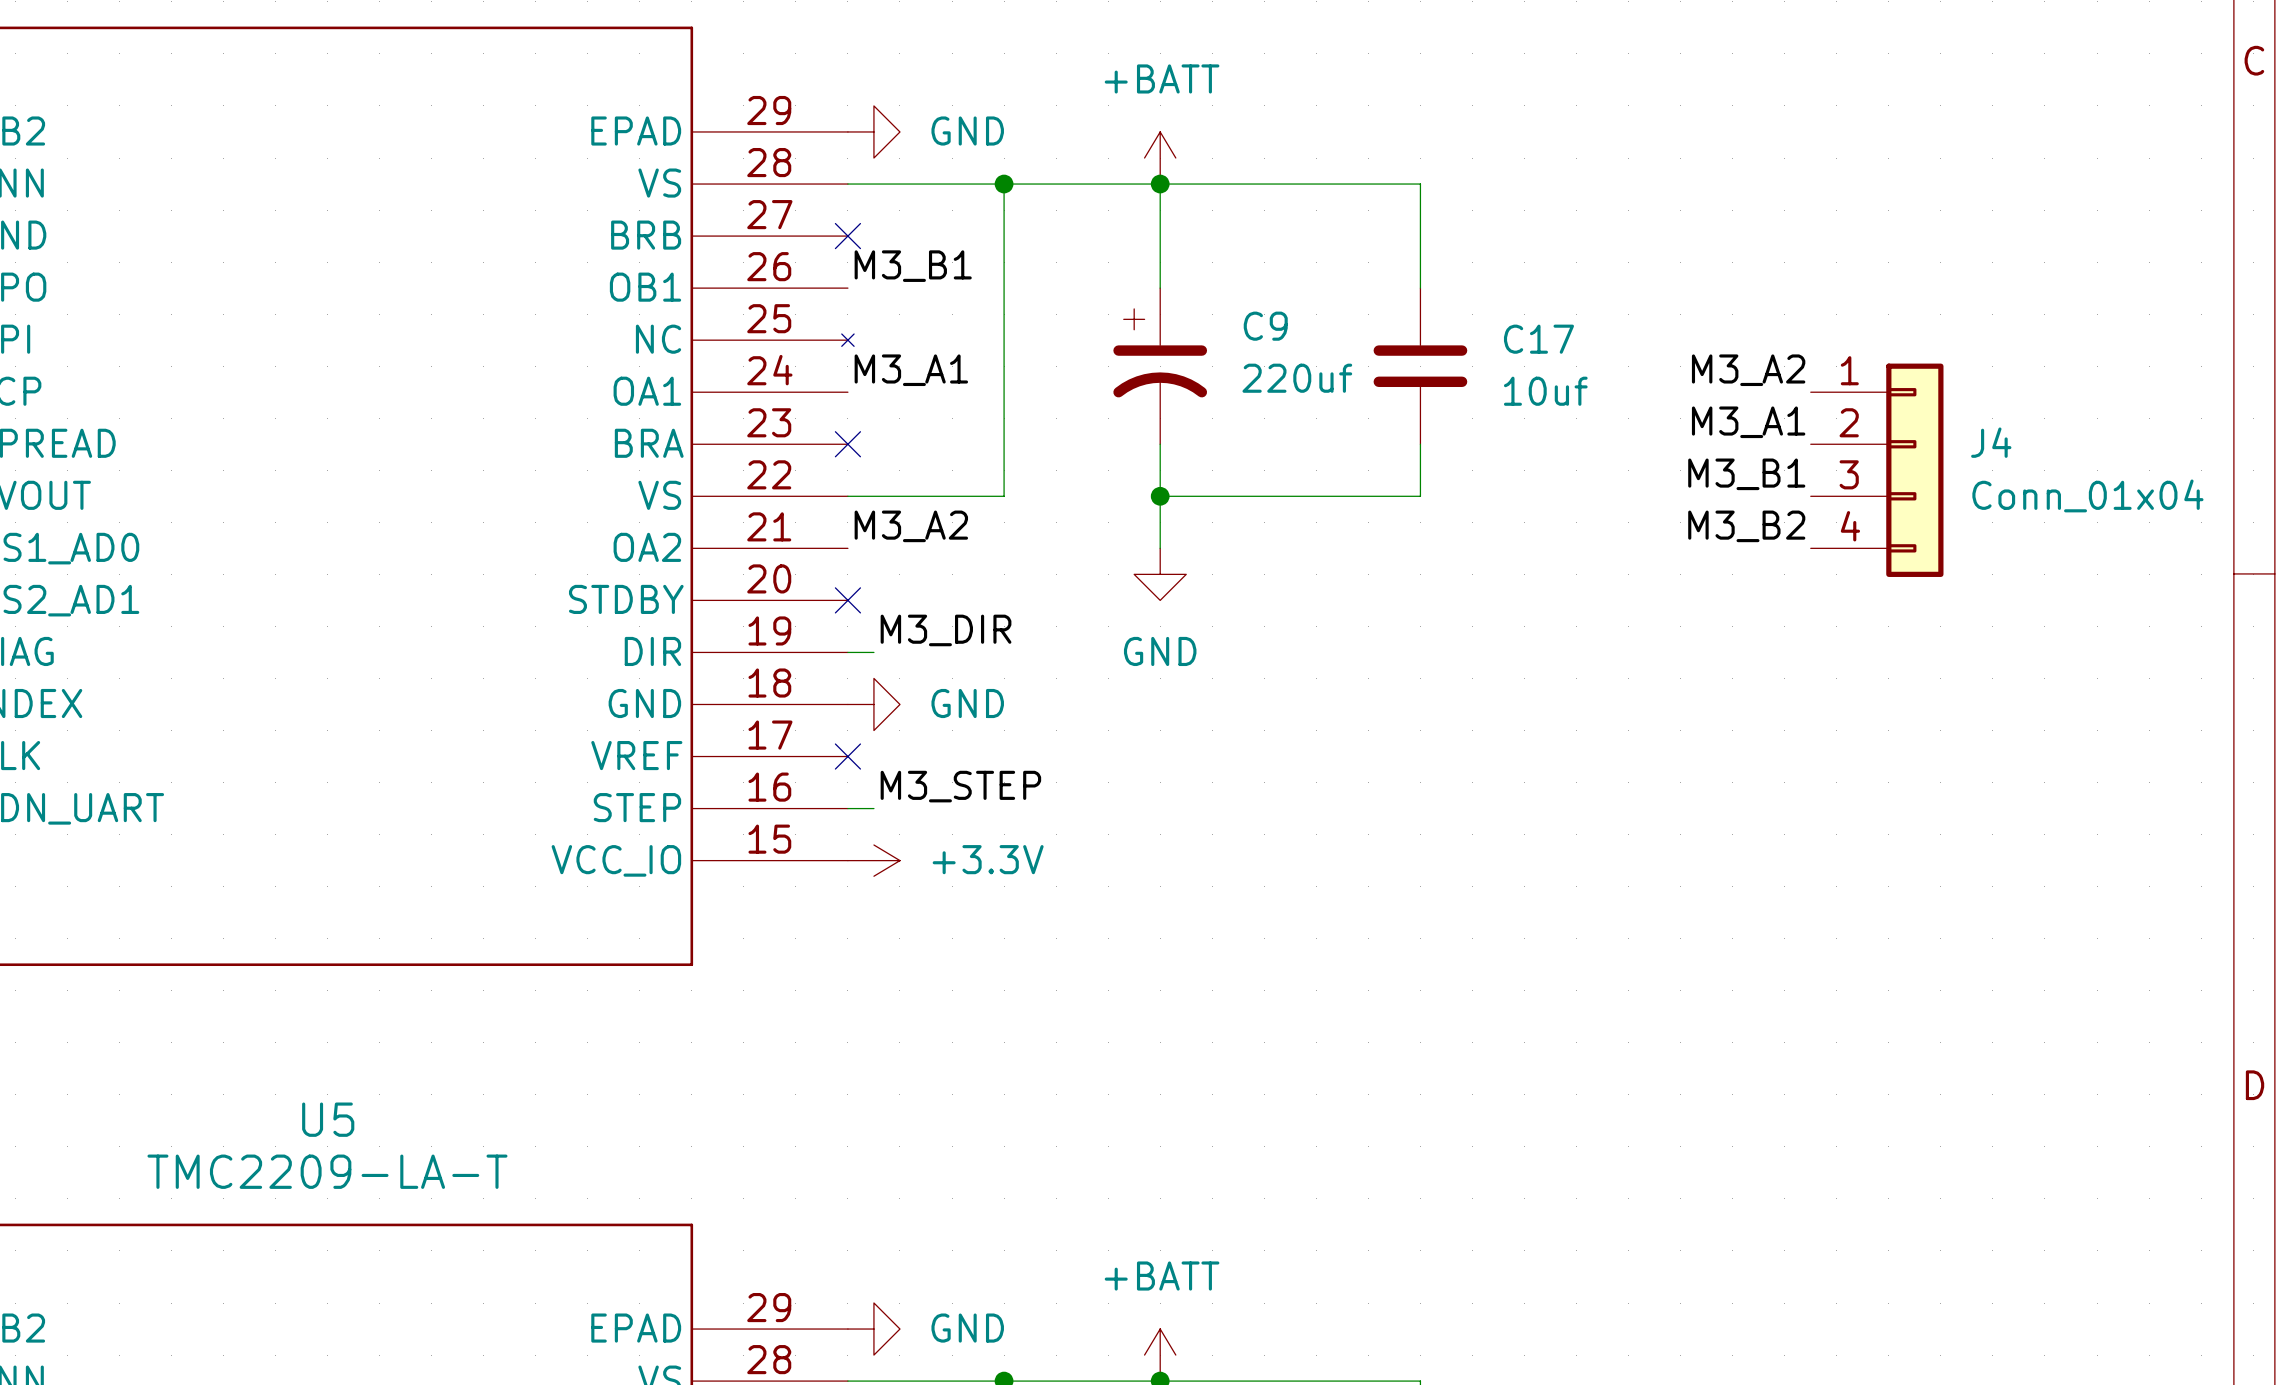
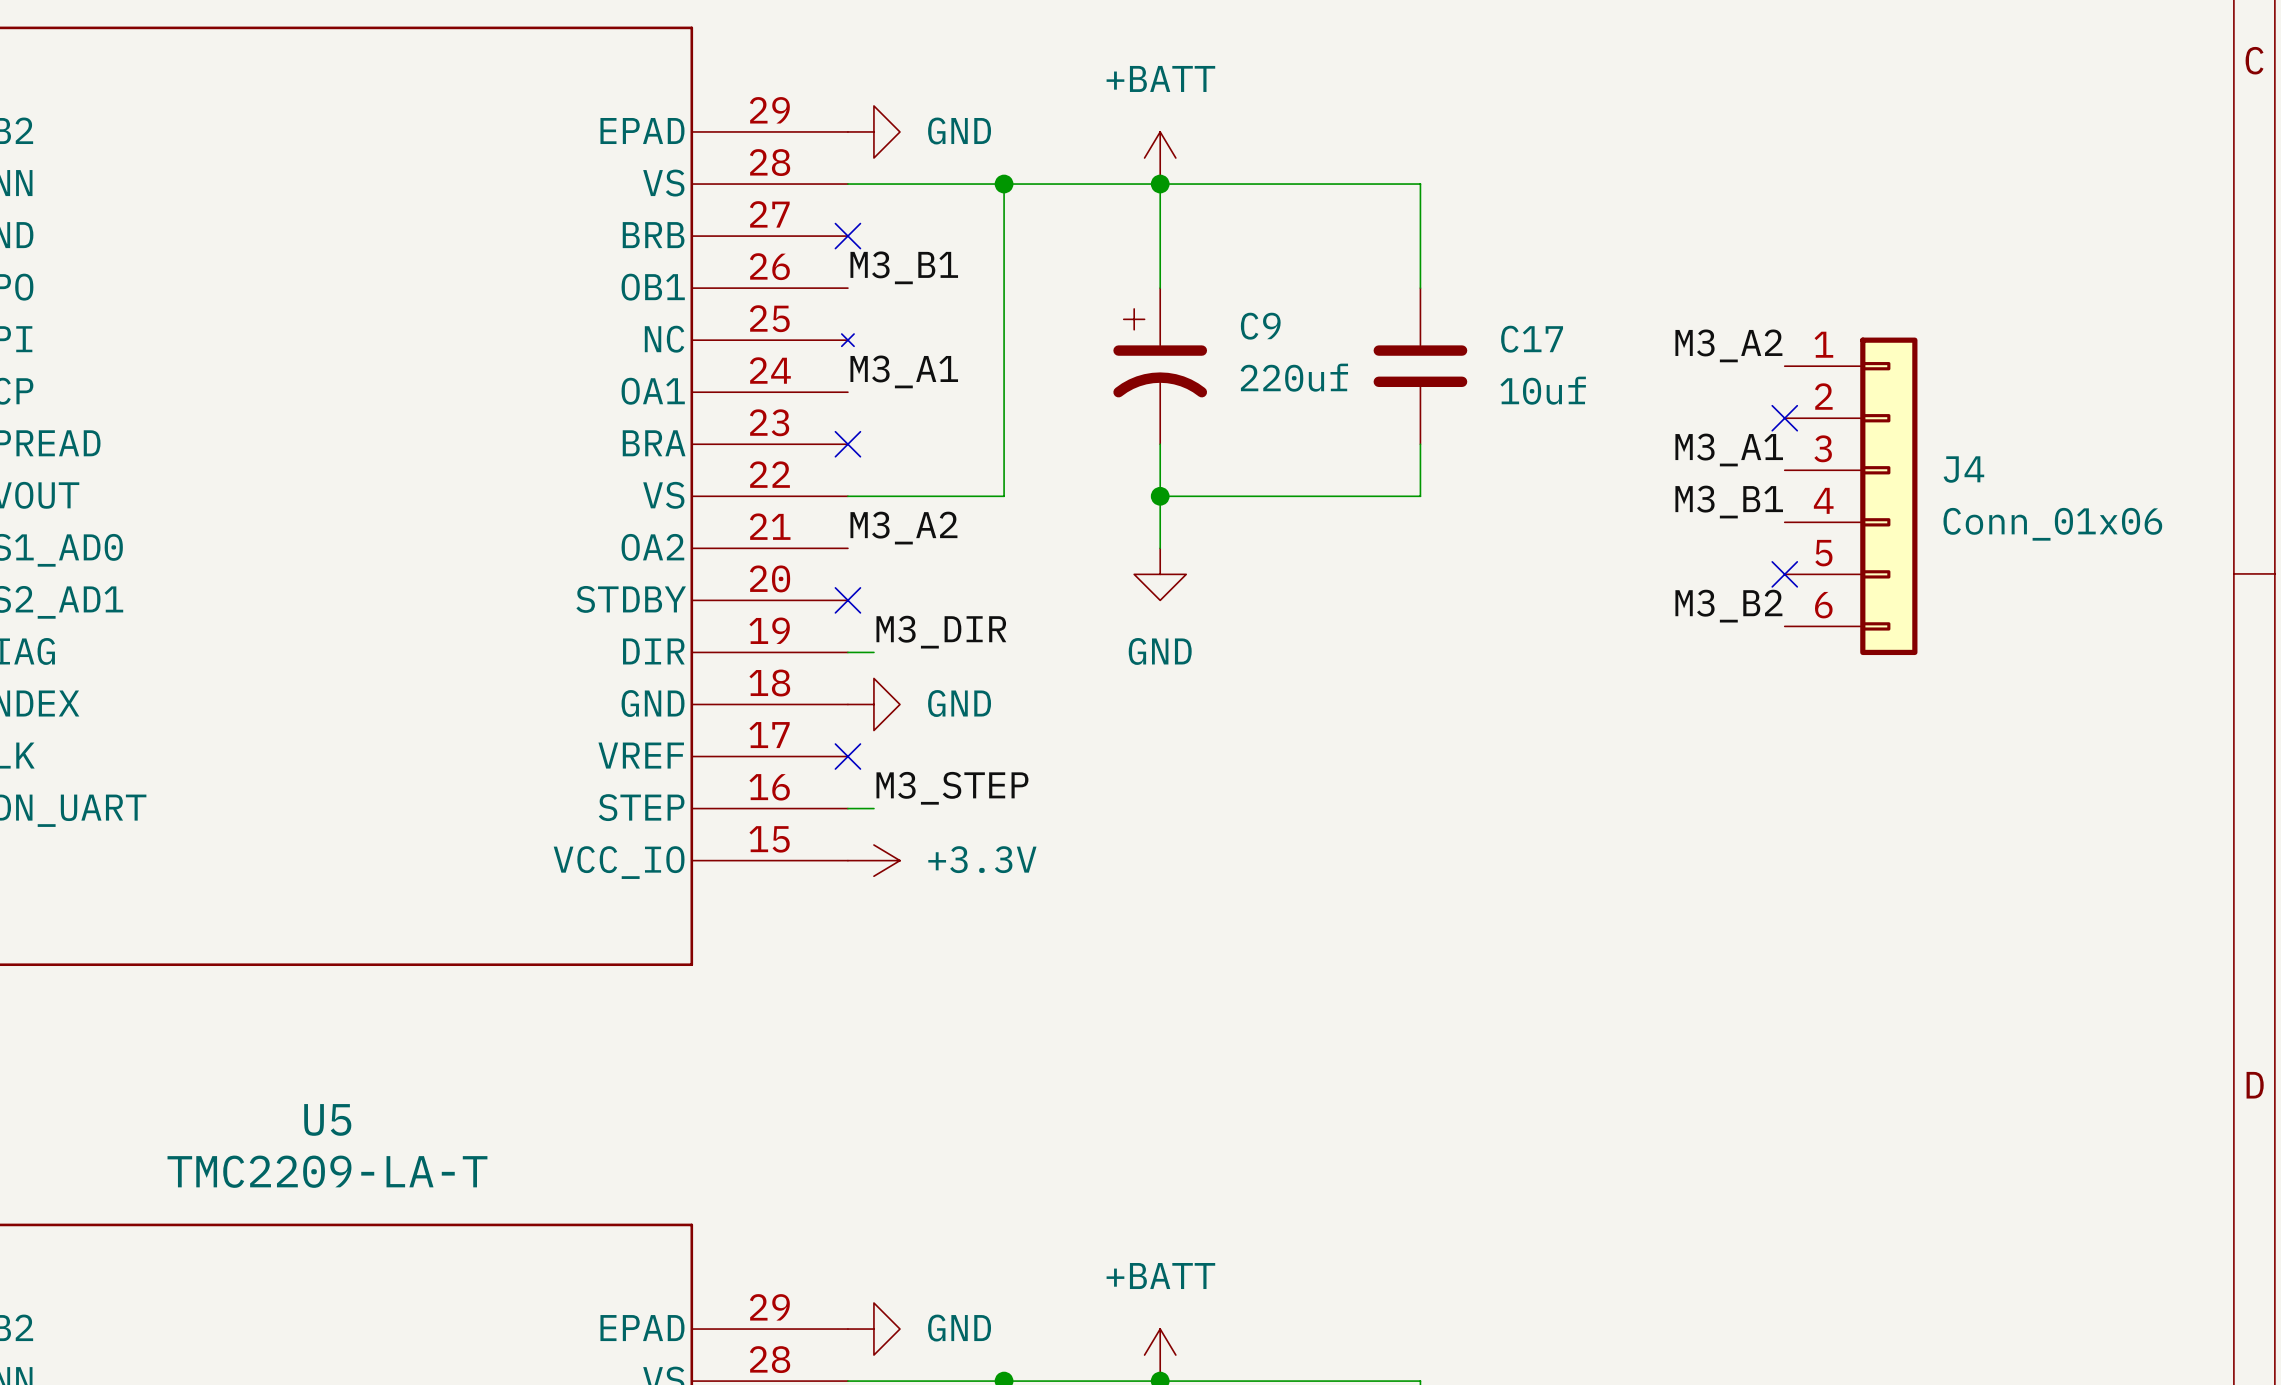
J4 symbol: [1810, 363, 1944, 577] -> [1784, 337, 1918, 656]
label position: M3_A2 (1748, 370) -> M3_A2 (1728, 345)
no-connect mark: none -> (1784, 418)
label position: M3_A1 (1748, 422) -> M3_A1 (1729, 449)
label position: M3_B1 (1746, 474) -> M3_B1 (1729, 502)
J4 value: Conn_01x04 (2087, 495) -> Conn_01x06 (2052, 524)
label position: M3_B2 (1746, 526) -> M3_B2 (1728, 606)
no-connect mark: none -> (1784, 574)

